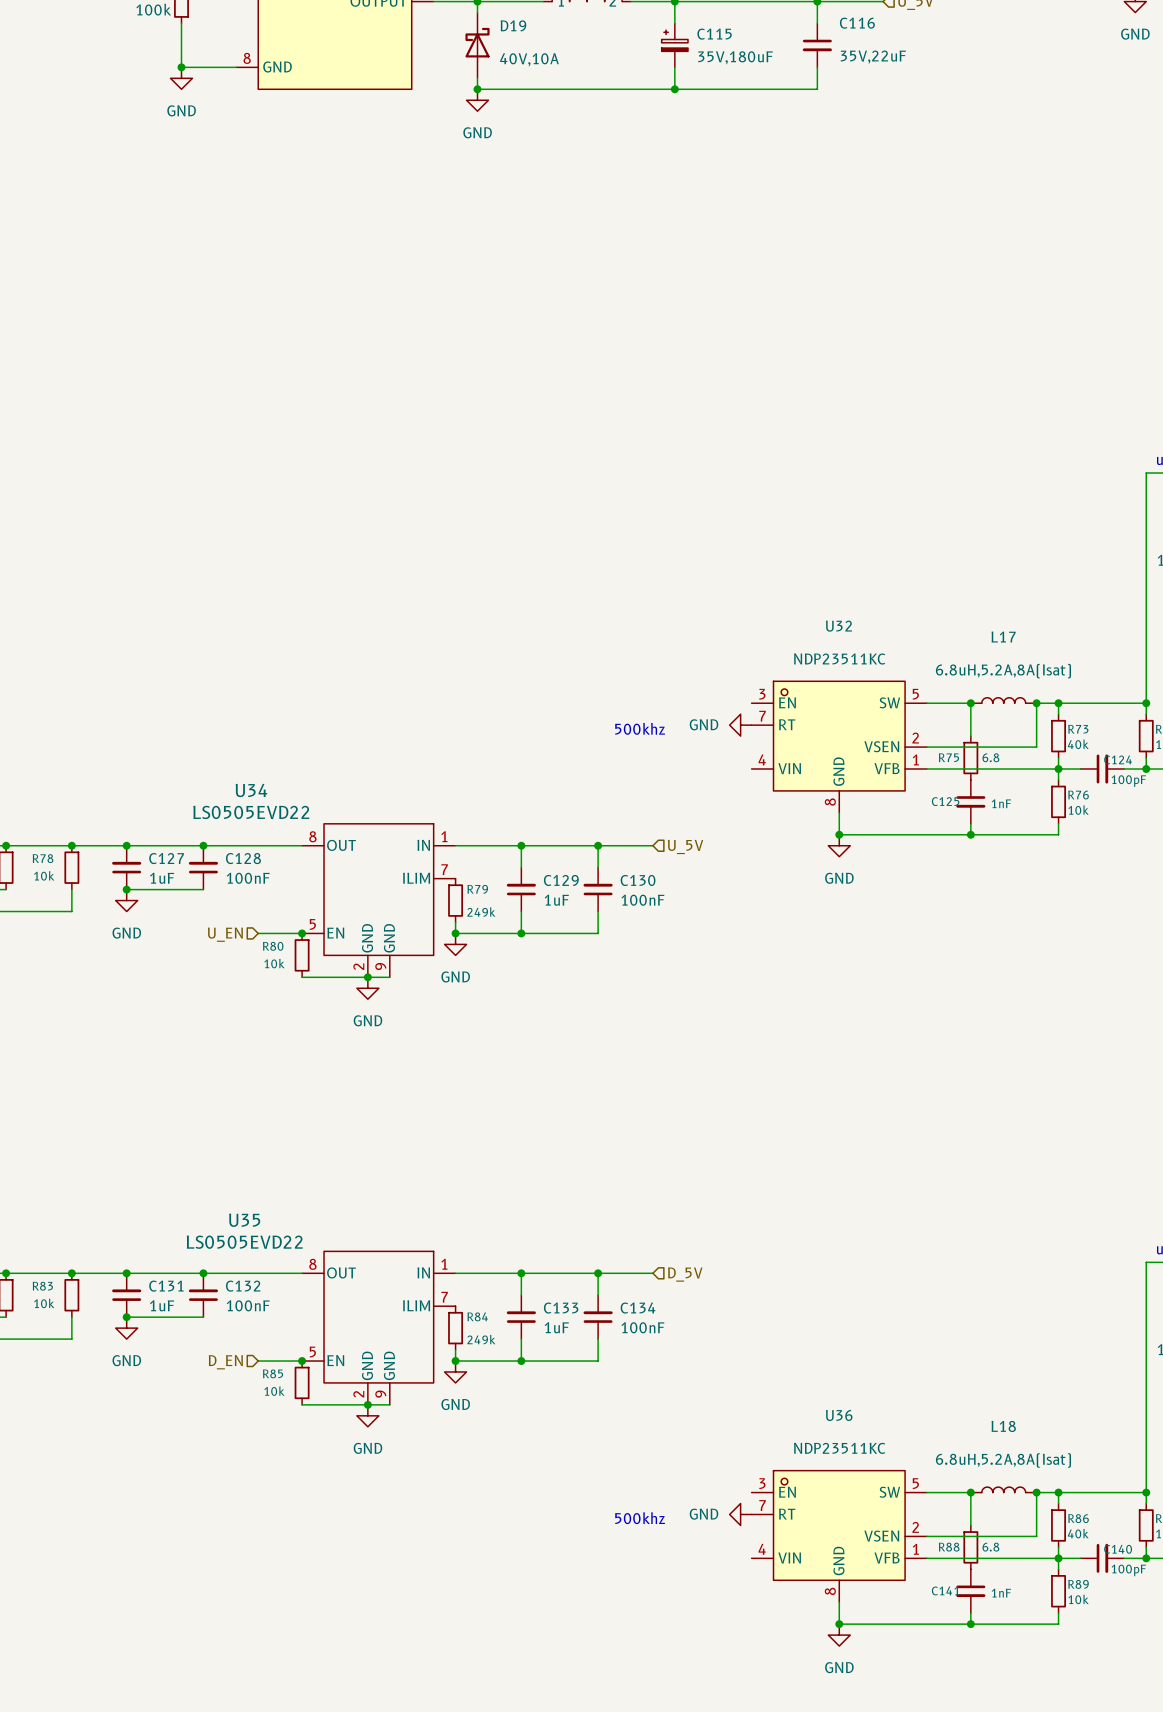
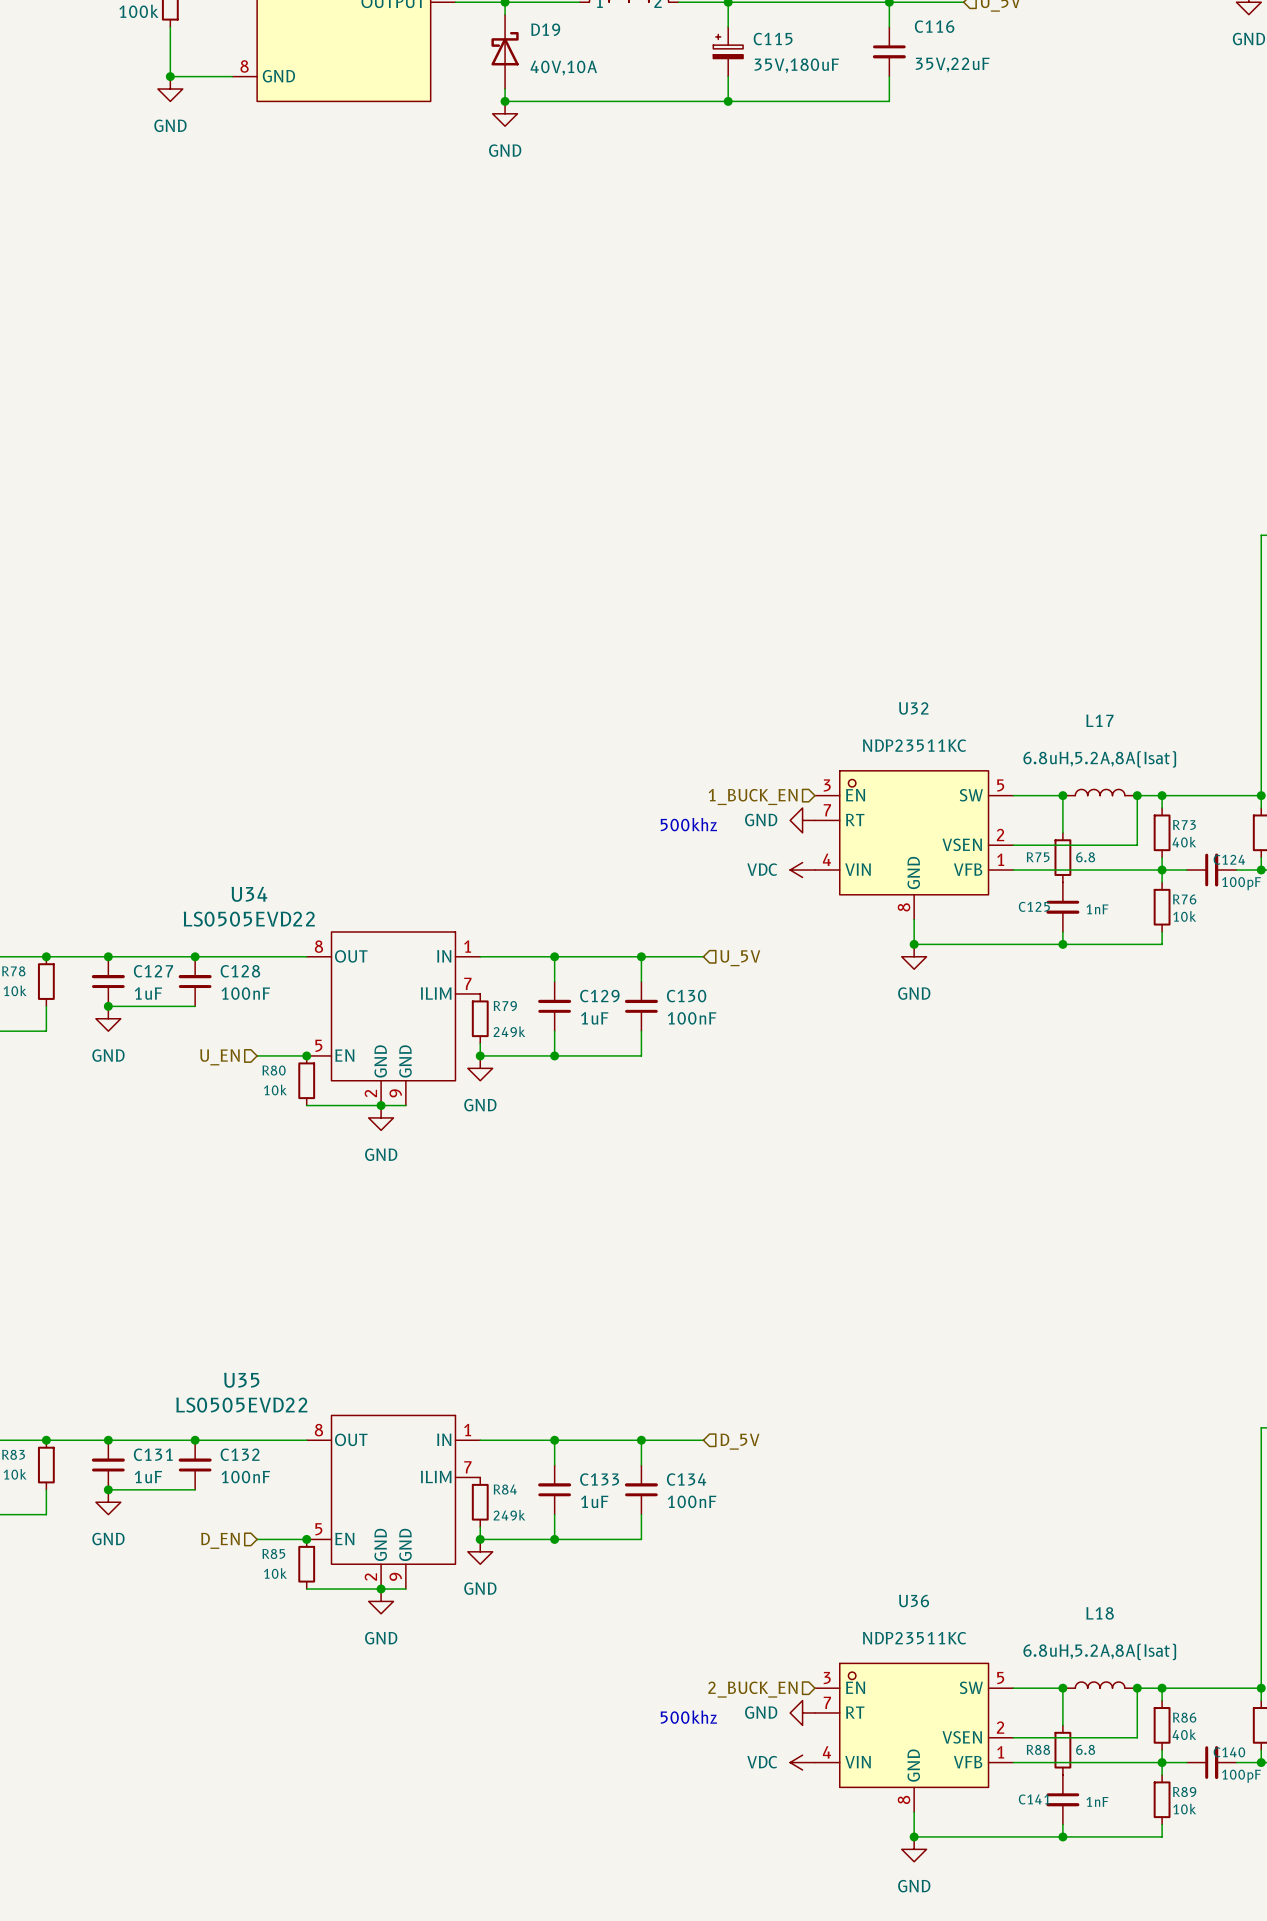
hierarchical label: none -> 1_BUCK_EN (753, 797)
power symbol: none -> VDC (802, 870)
hierarchical label: none -> 2_BUCK_EN (752, 1689)
power symbol: none -> VDC (802, 1762)

